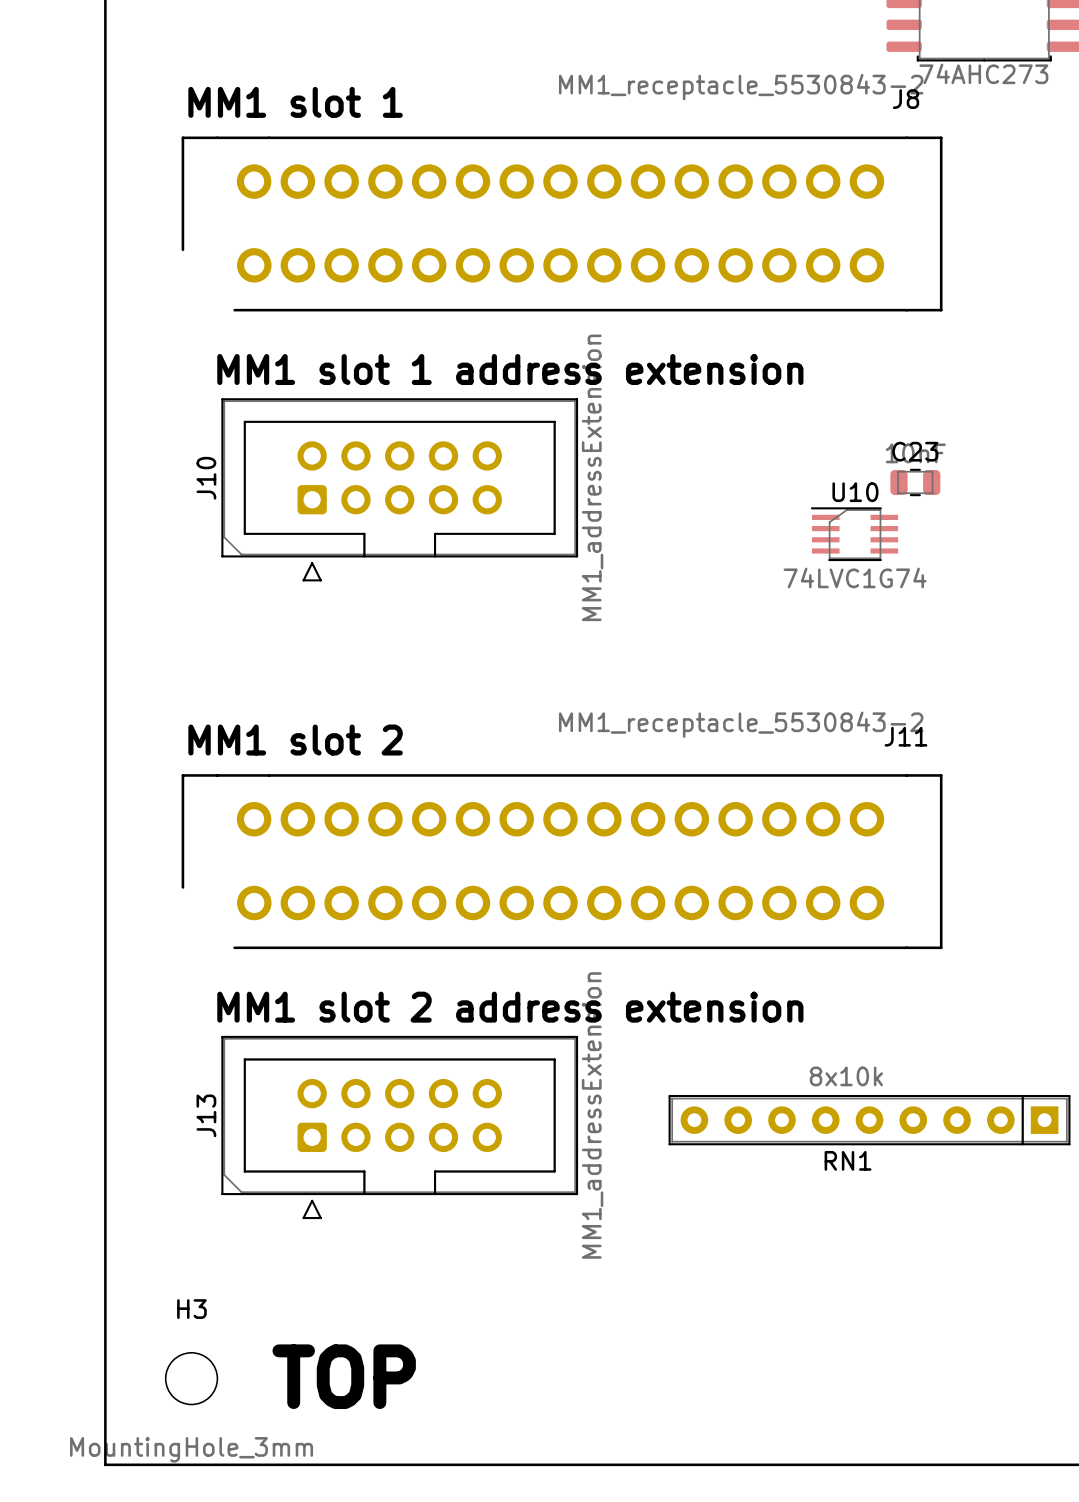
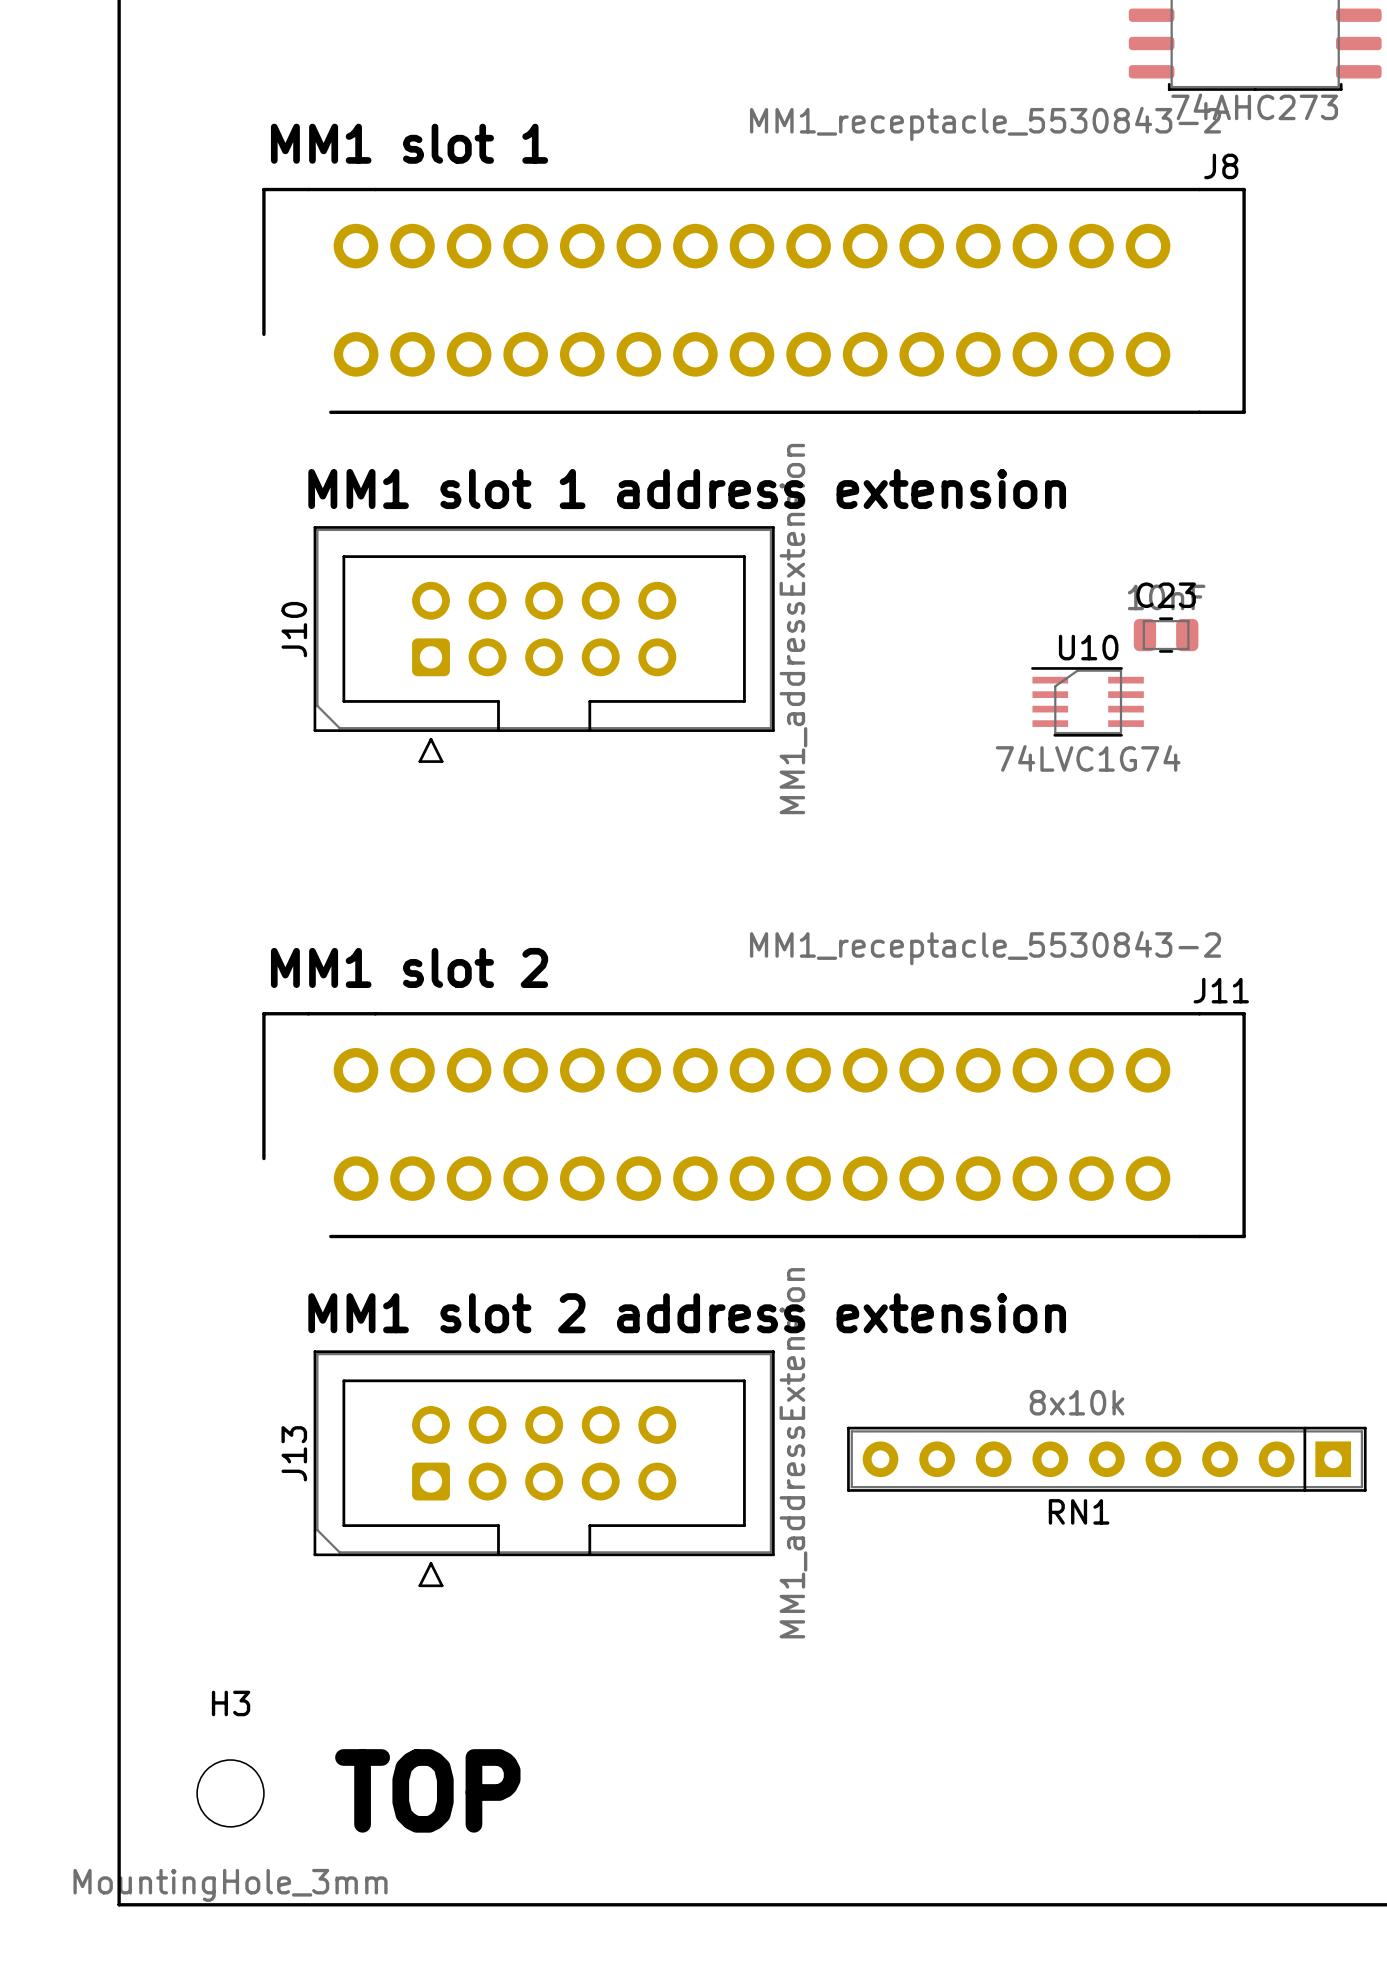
J8 name position: J8 (905, 99) -> J8 (1221, 166)
text position: MM1 slot 1 (295, 102) -> MM1 slot 1 (409, 143)
J8 position: (562, 223) -> (754, 300)
text position: MM1 slot 1 address extension (510, 369) -> MM1 slot 1 address extension (687, 489)
J10 position: (399, 489) -> (544, 644)
J11 name position: J11 (905, 736) -> J11 (1221, 990)
text position: MM1 slot 2 (295, 740) -> MM1 slot 2 (409, 967)
J11 position: (562, 861) -> (754, 1125)
text position: MM1 slot 2 address extension (510, 1007) -> MM1 slot 2 address extension (687, 1313)
J13 position: (399, 1127) -> (544, 1468)

